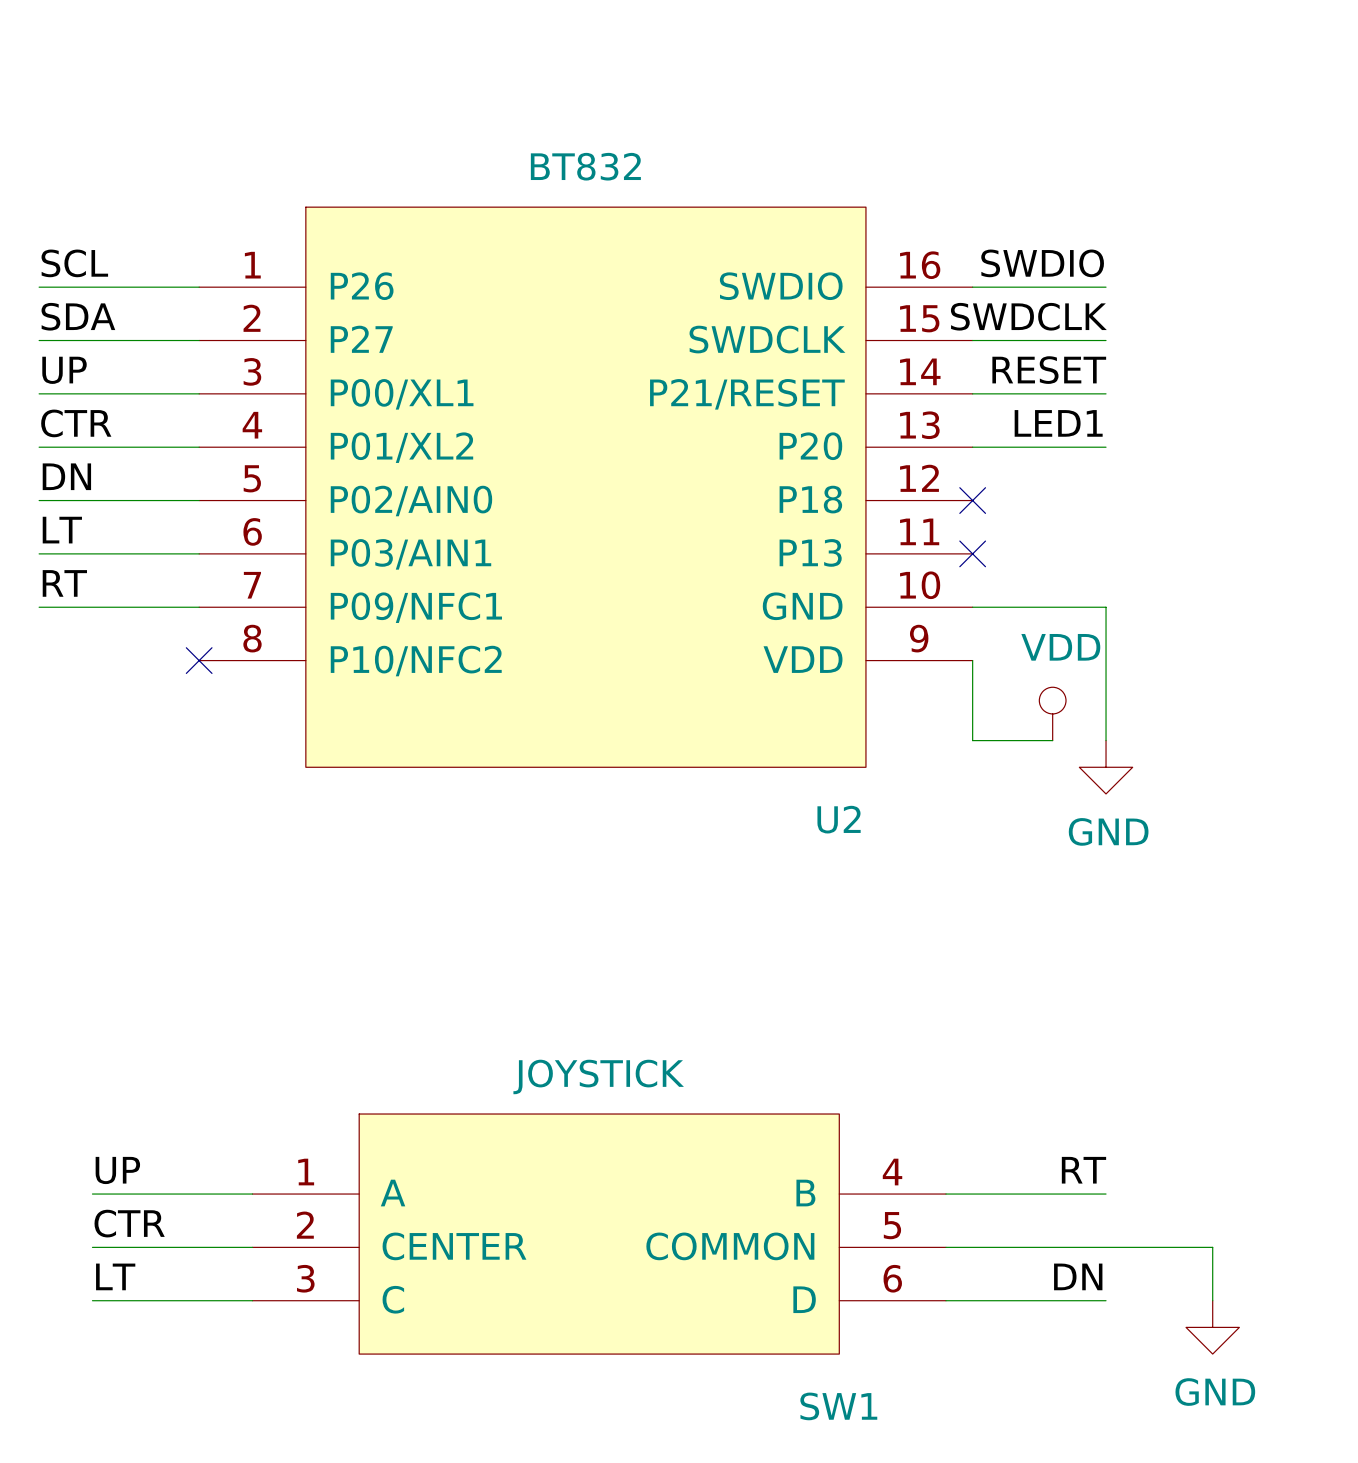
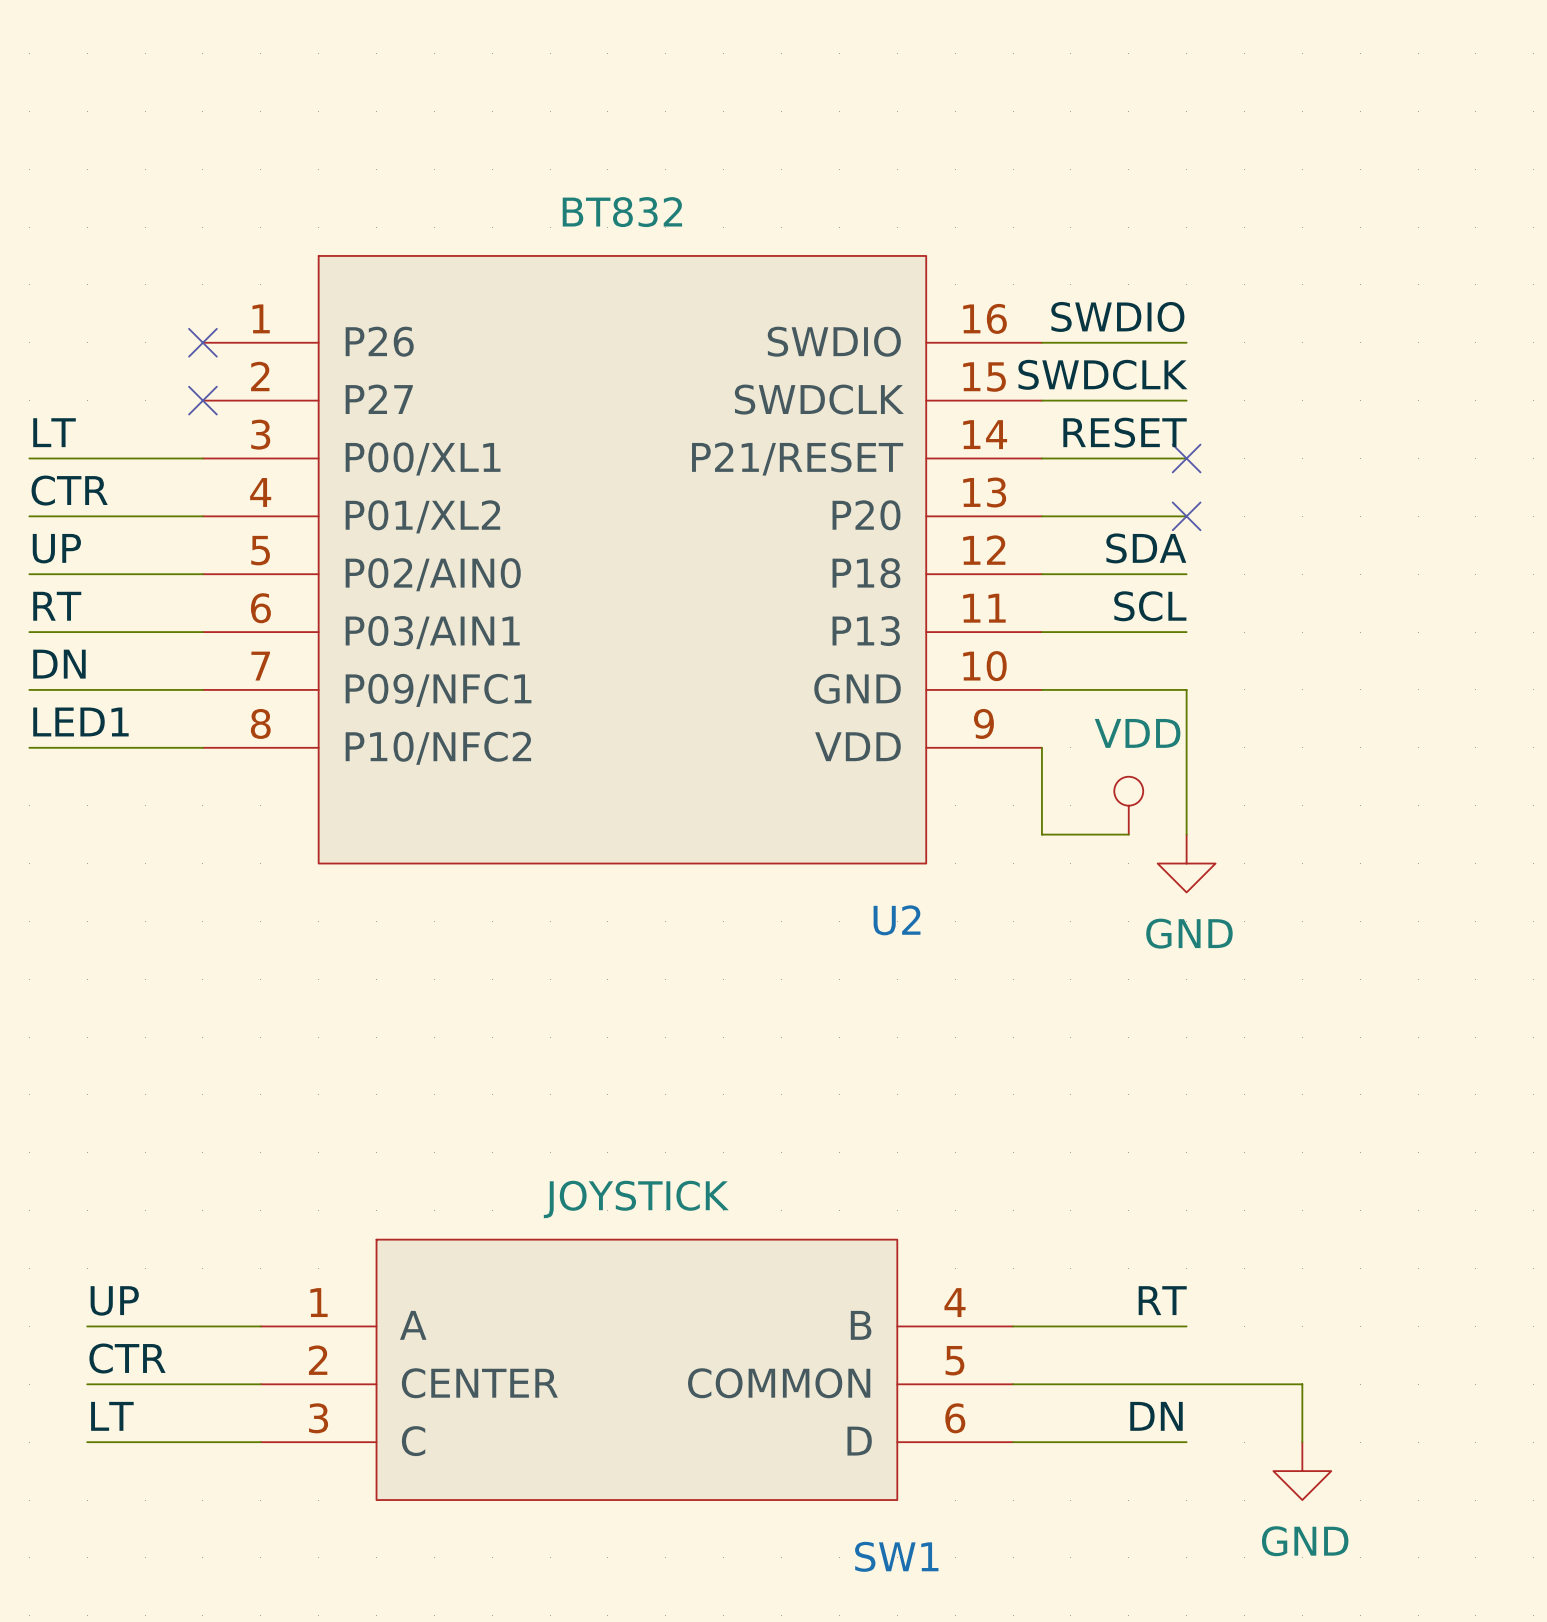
label: SCL (74, 263) -> none
wire: (39, 287) (199, 287) -> none
no-connect mark: none -> (202, 342)
label: SDA (78, 316) -> none
wire: (39, 340) (199, 340) -> (29, 747) (202, 747)
no-connect mark: none -> (202, 400)
label: UP (64, 370) -> LT (54, 432)
no-connect mark: none -> (1186, 458)
label: LED1 (1058, 423) -> none
no-connect mark: none -> (1186, 516)
label: DN (66, 476) -> UP (56, 548)
label: none -> SDA (1146, 548)
wire: none -> (1041, 574) (1186, 574)
no-connect mark: (972, 500) -> none
label: LT (62, 530) -> RT (57, 606)
label: none -> SCL (1150, 606)
wire: none -> (1041, 632) (1186, 632)
no-connect mark: (972, 553) -> none
label: RT (64, 583) -> DN (59, 664)
label: none -> LED1 (80, 721)
no-connect mark: (199, 660) -> none

